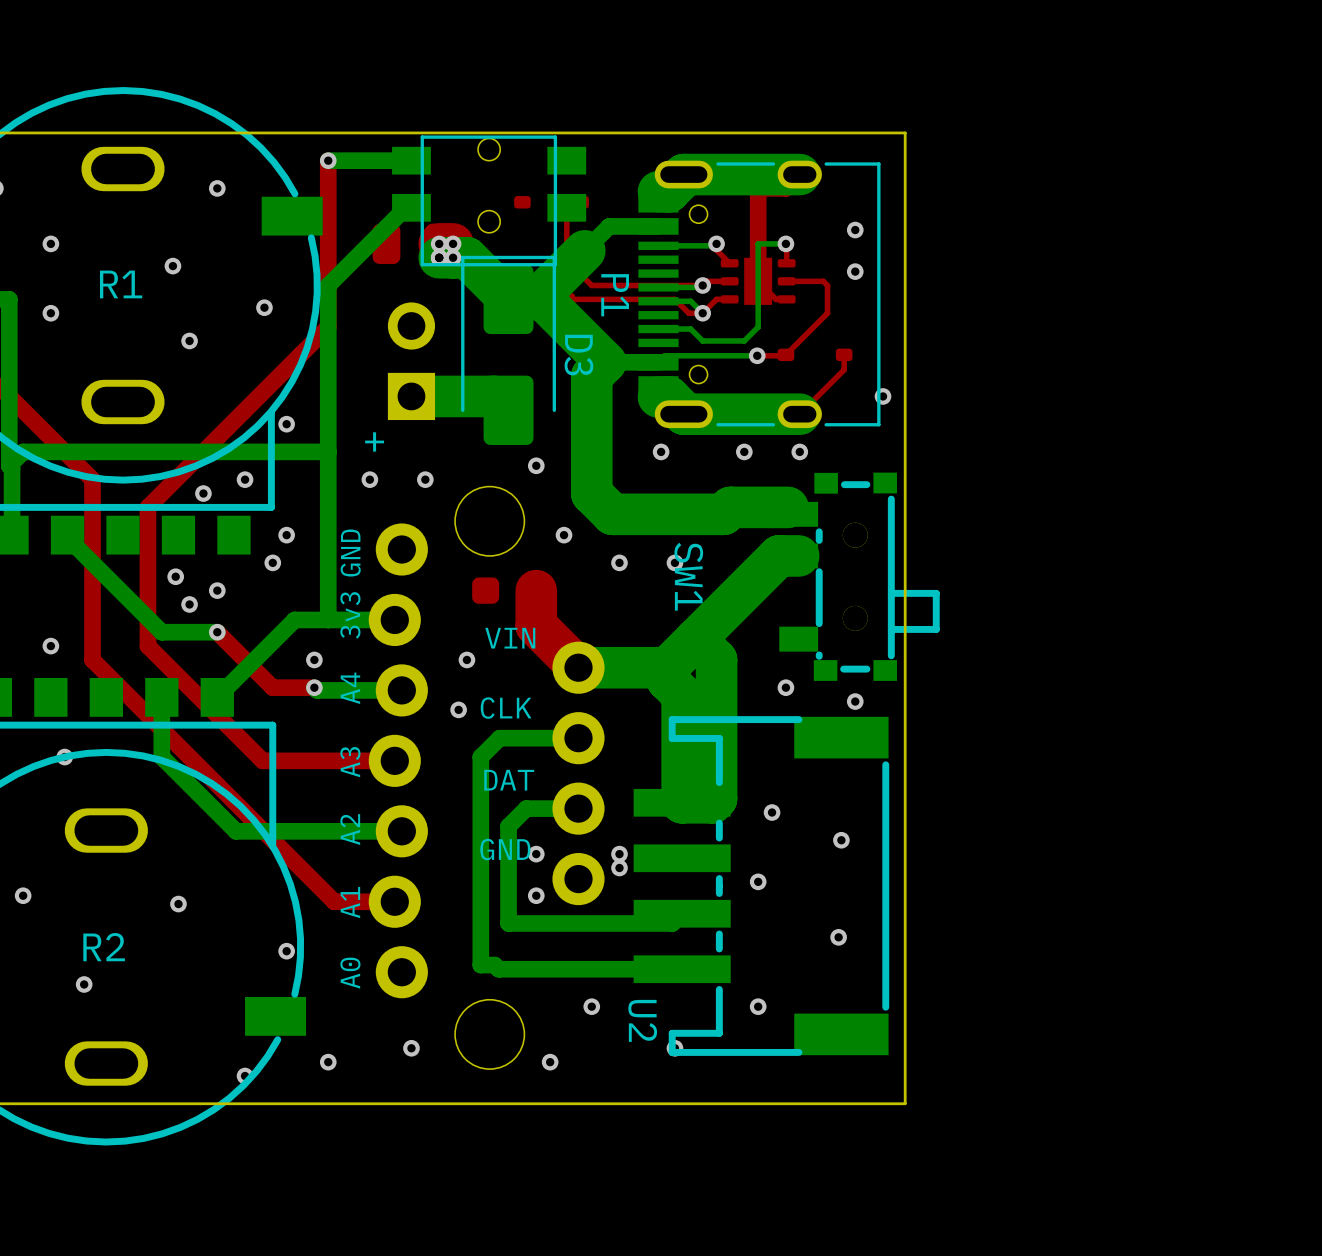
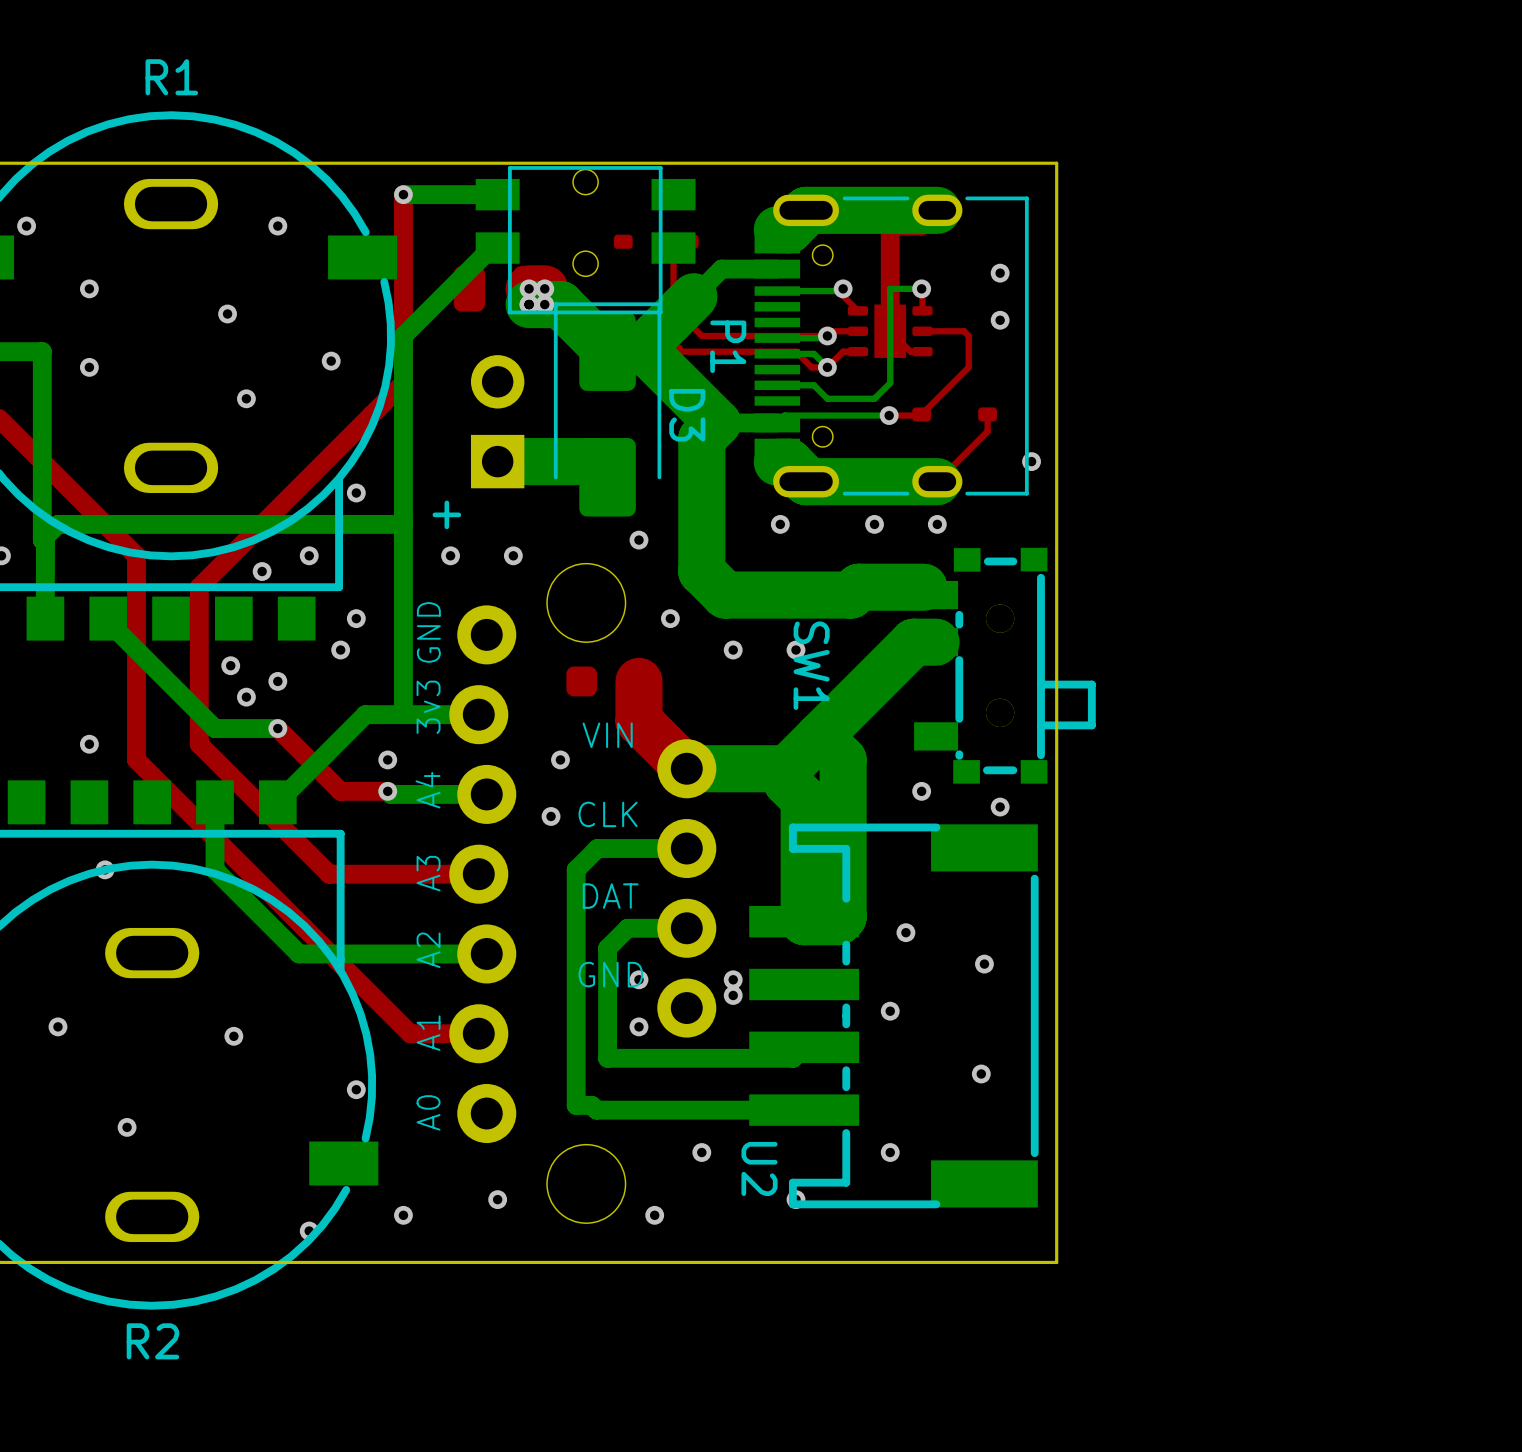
R1 name position: R1 (121, 284) -> R1 (171, 77)
R2 name position: R2 (104, 947) -> R2 (152, 1341)

